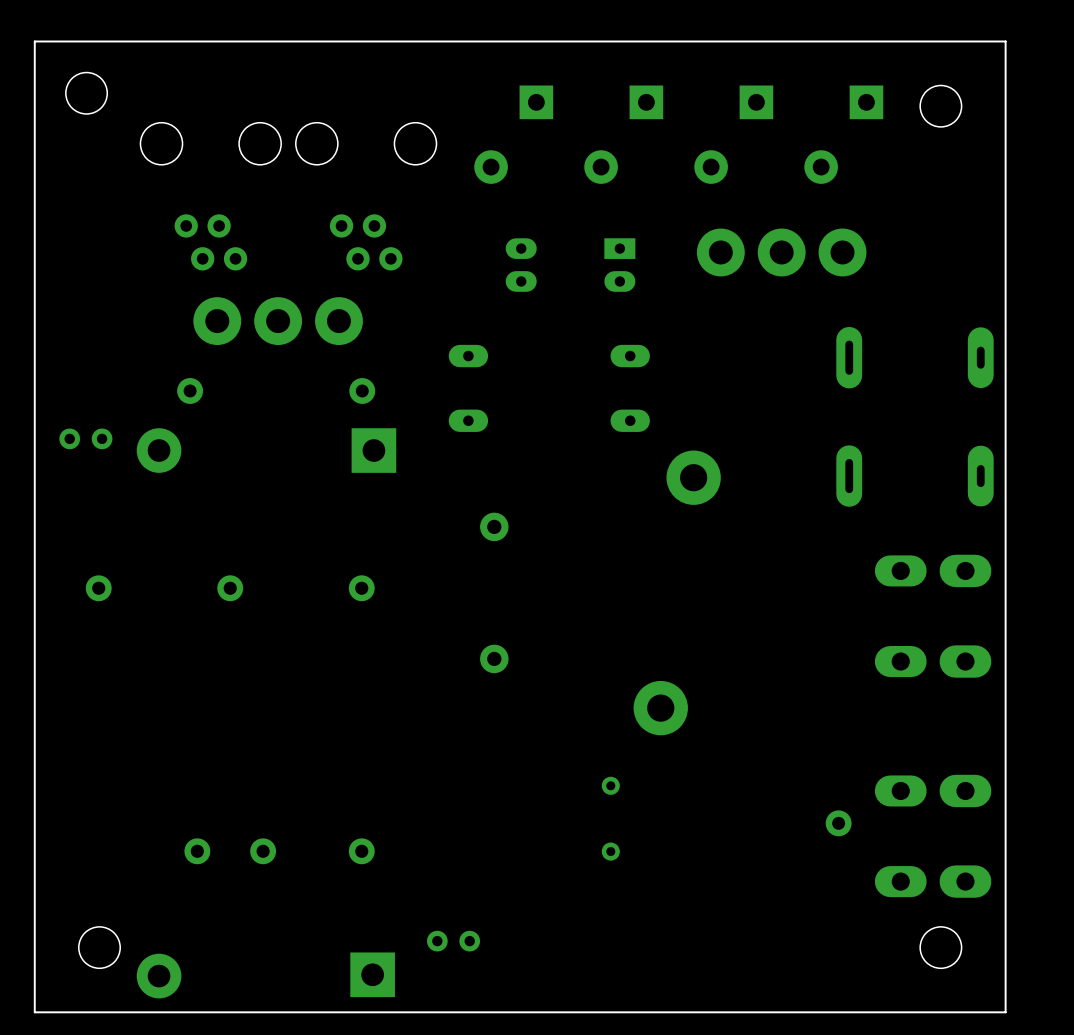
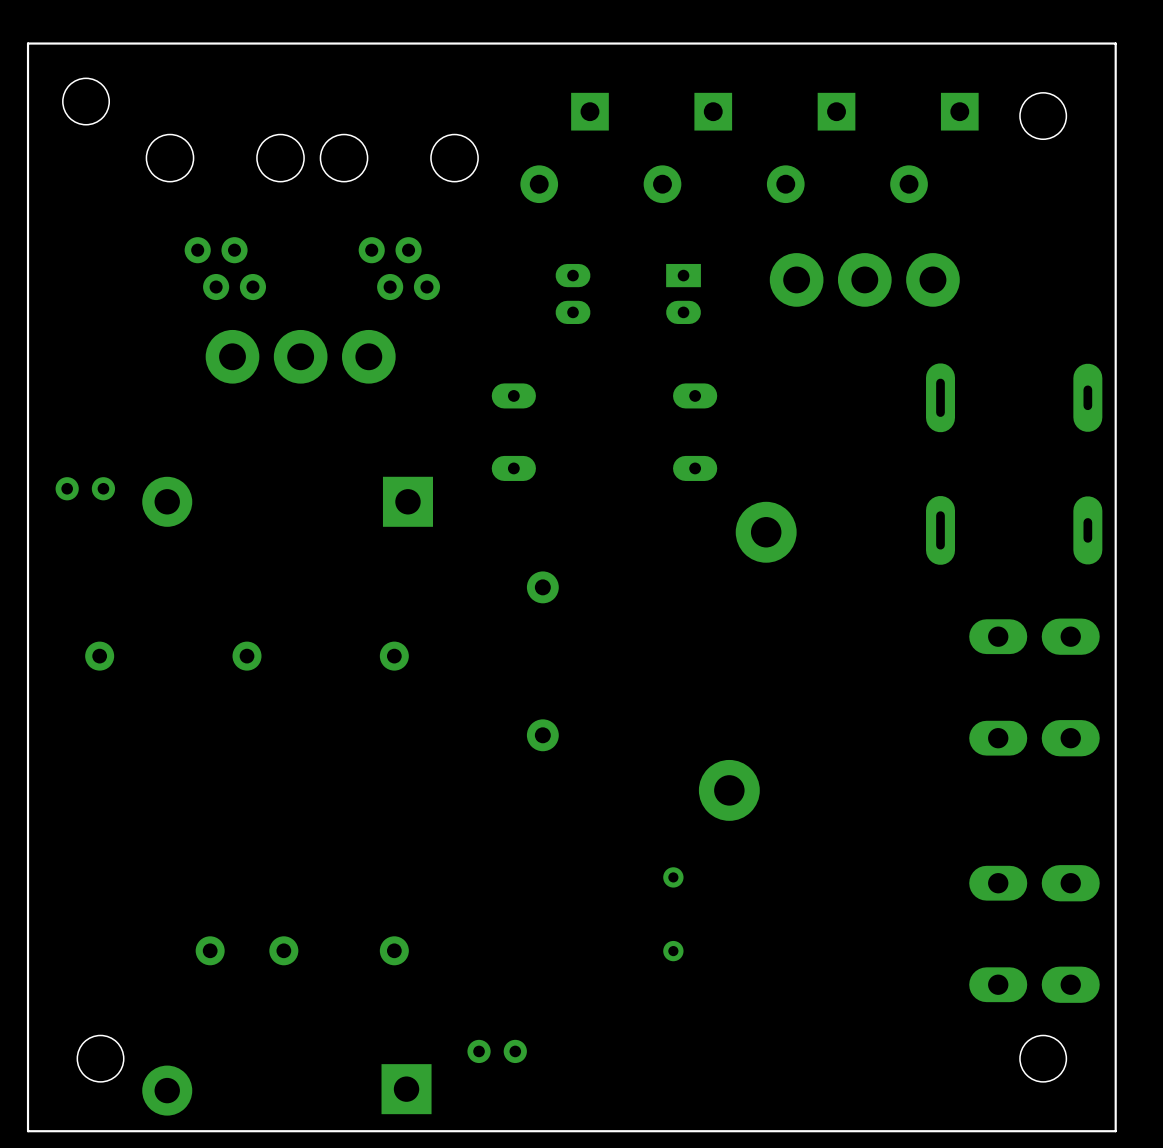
part: (190, 390) -> none
part: (362, 390) -> none
part: (838, 823) -> none

